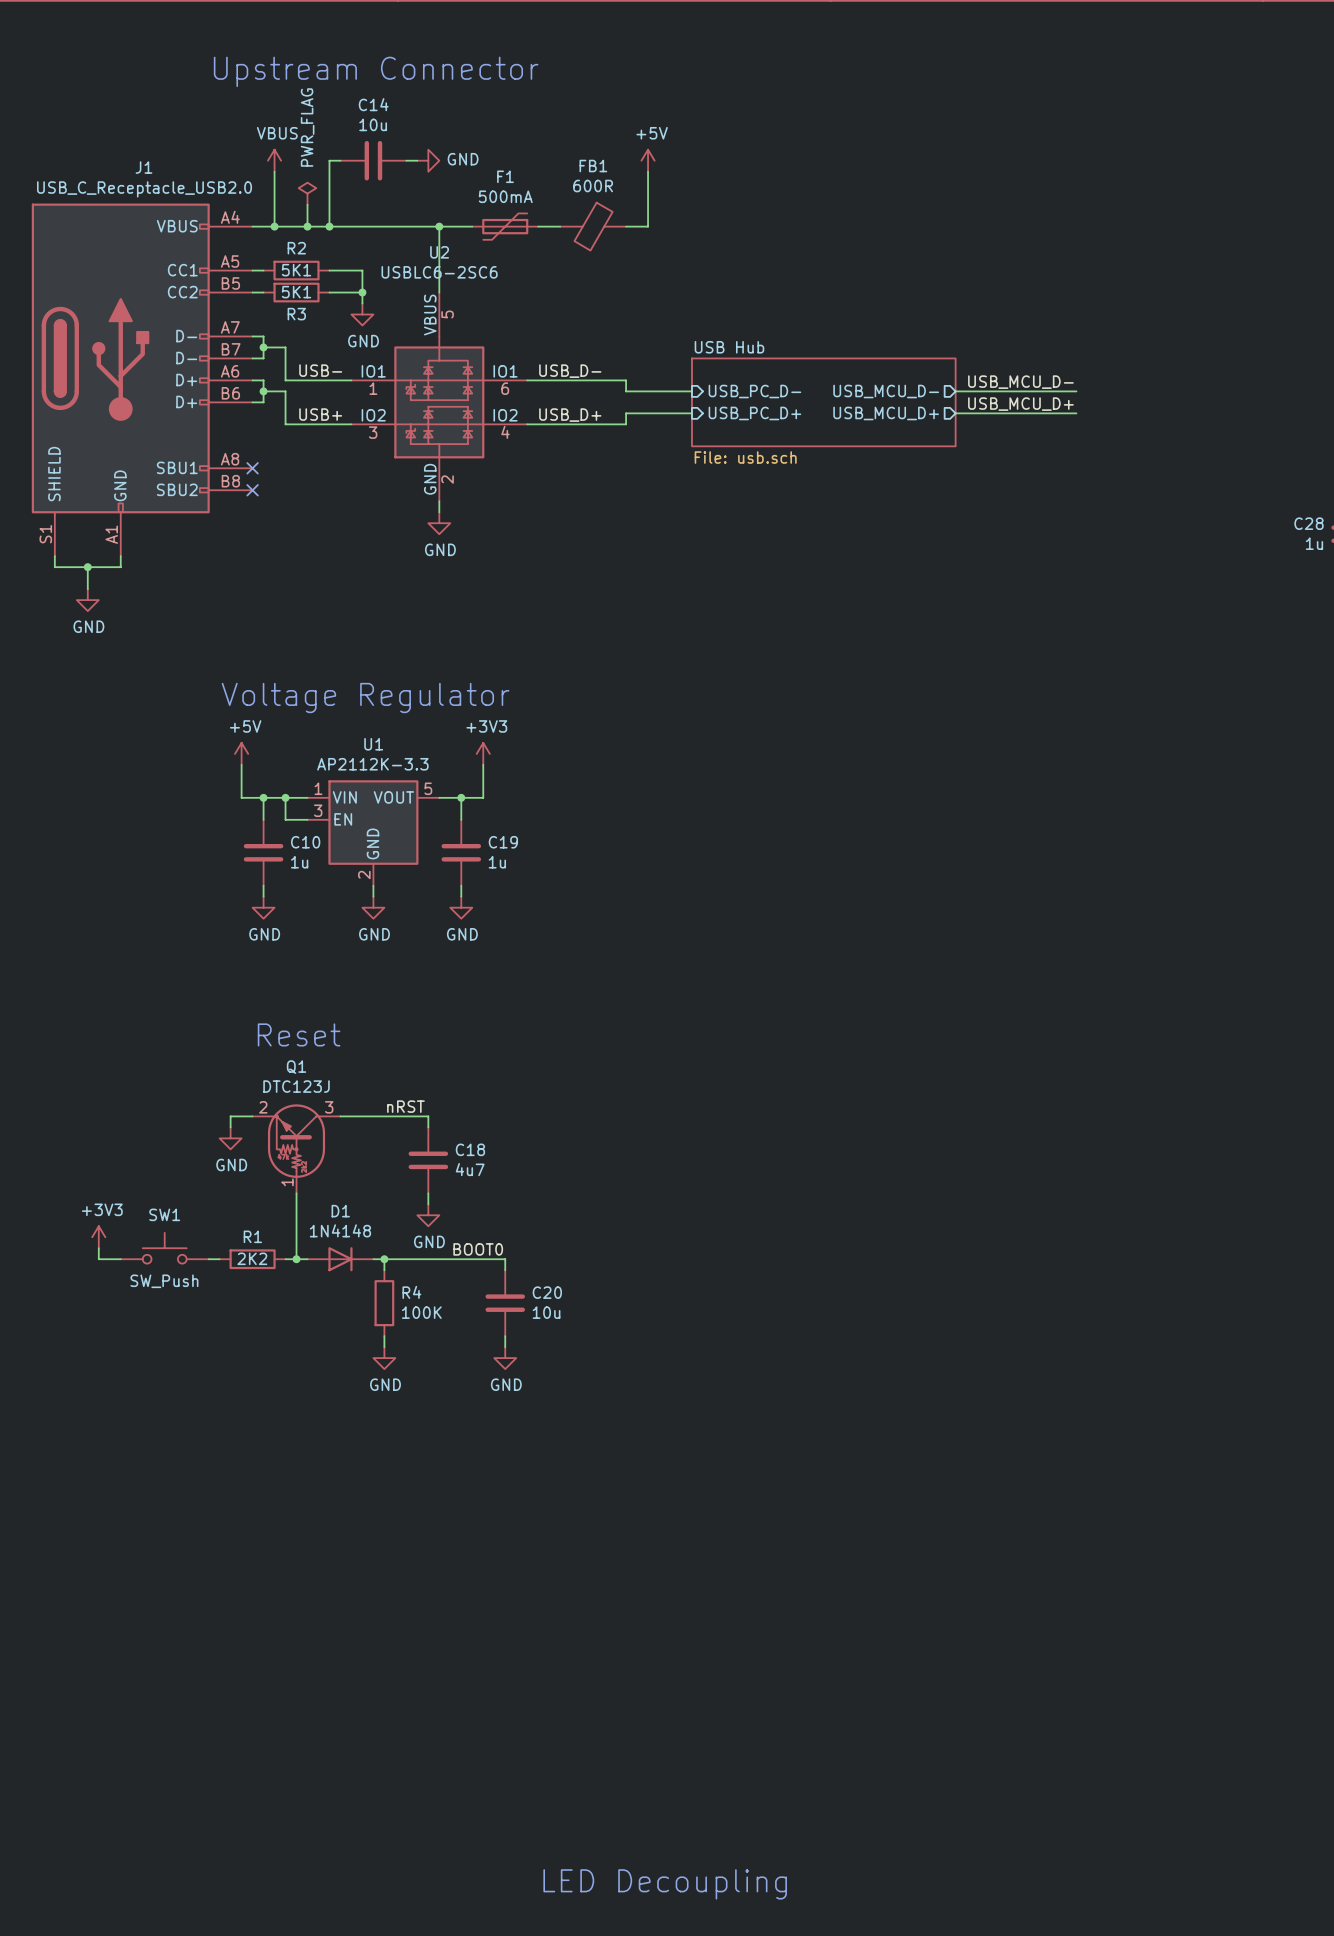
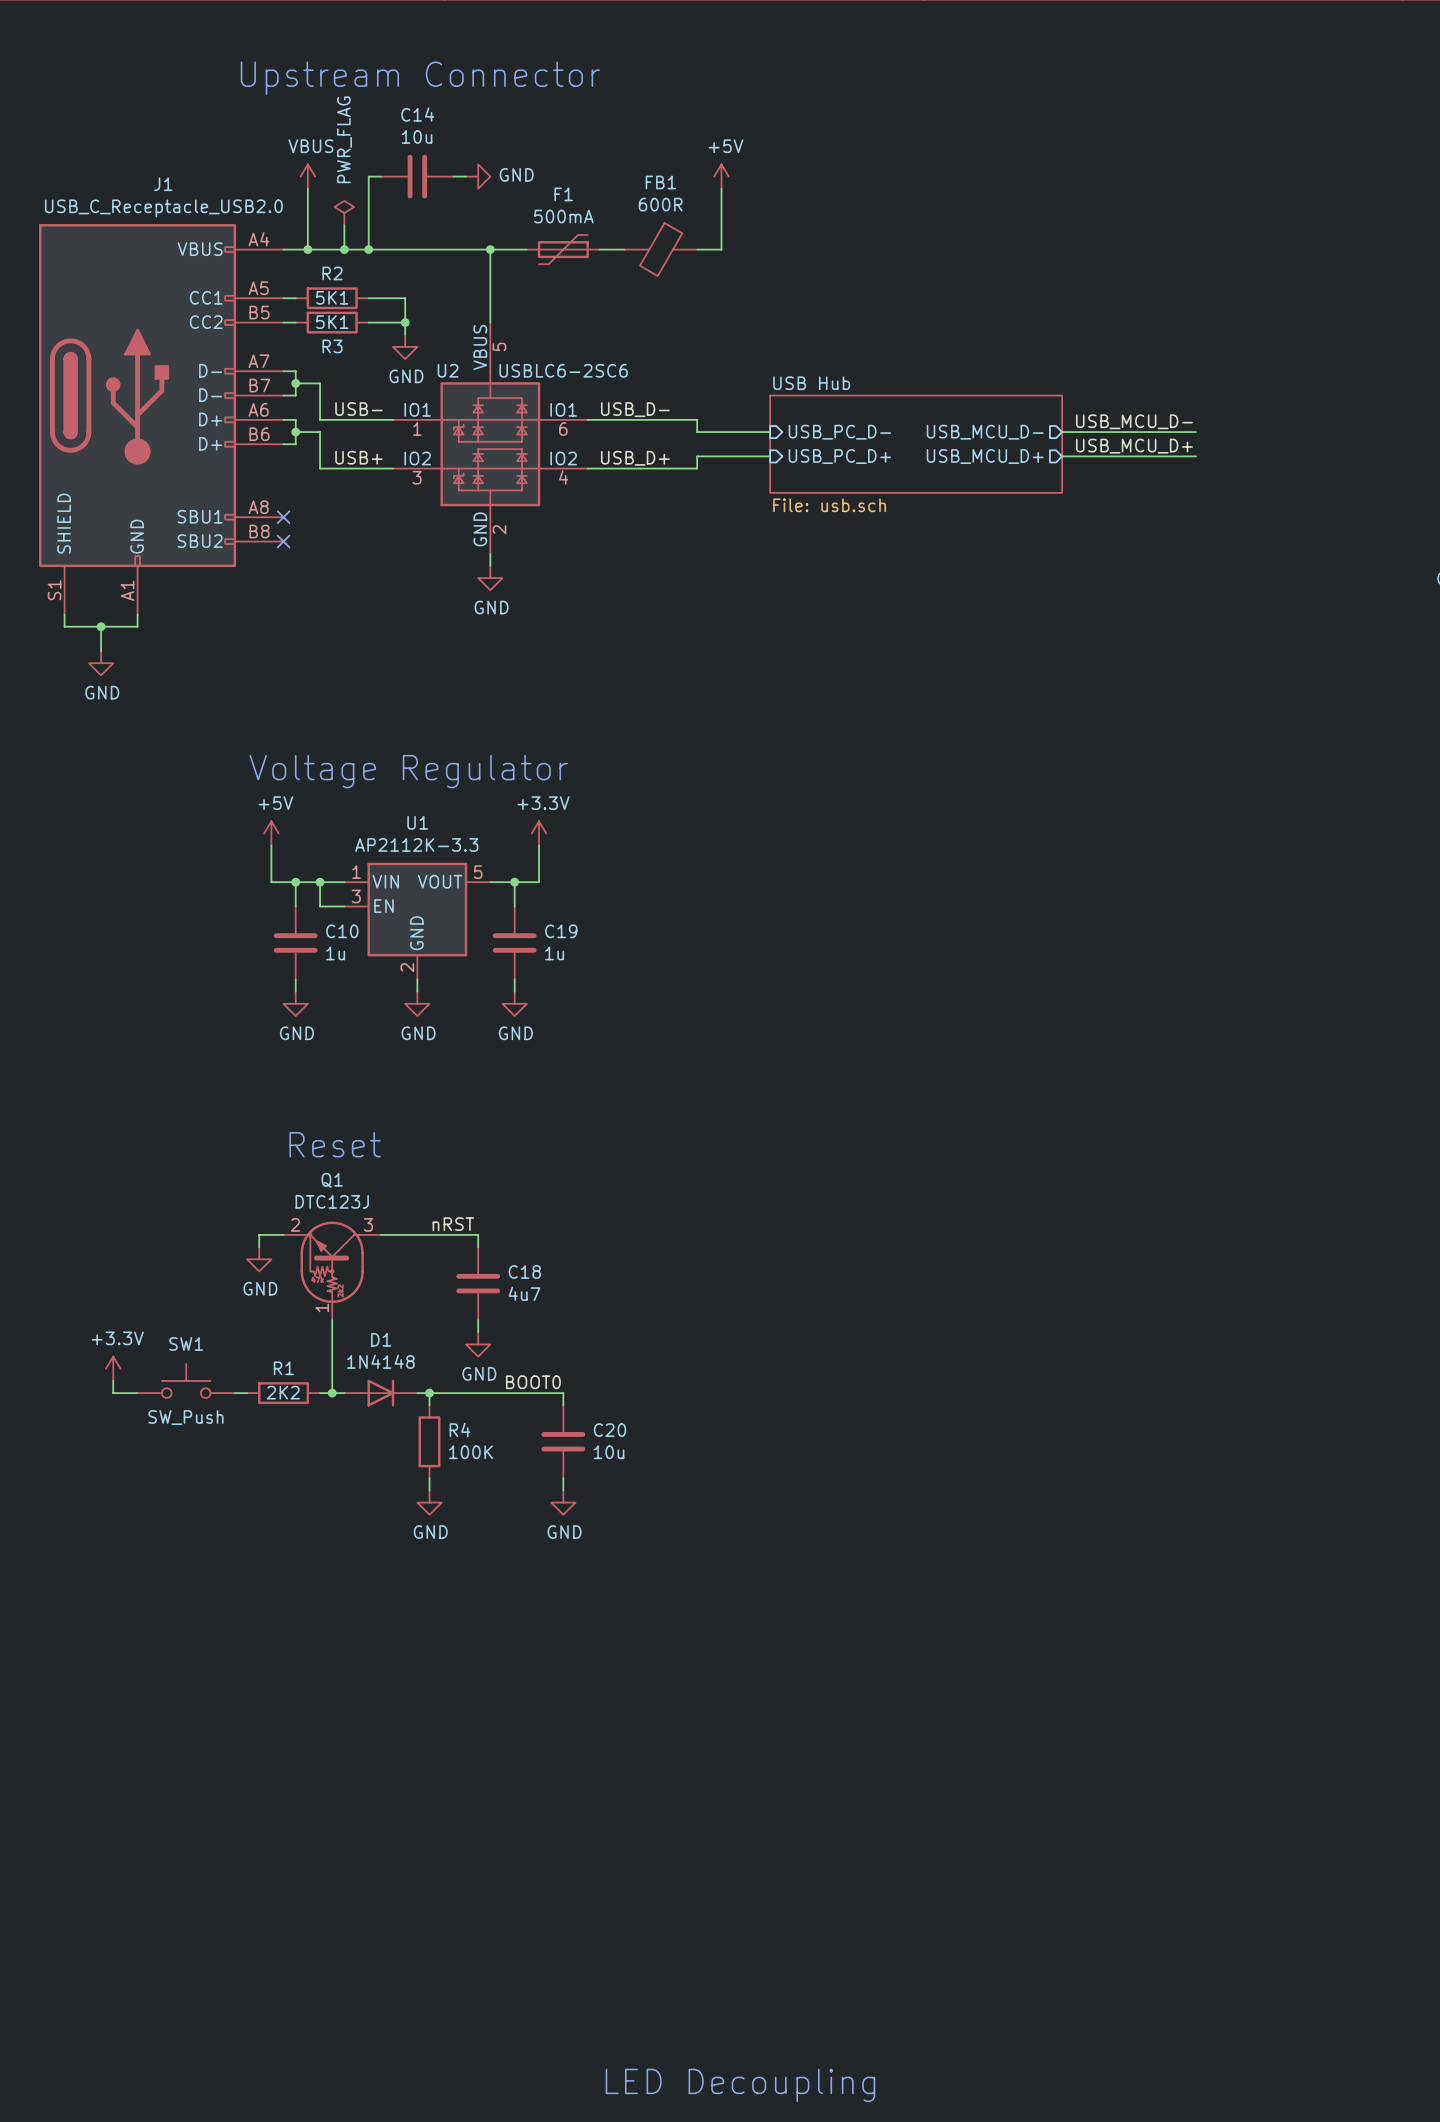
U2 name position: U2 (439, 252) -> U2 (448, 370)
U2 value position: USBLC6-2SC6 (439, 272) -> USBLC6-2SC6 (563, 370)
power symbol: +3V3 (483, 753) -> +3.3V (539, 833)
power symbol: +3V3 (98, 1237) -> +3.3V (113, 1368)

